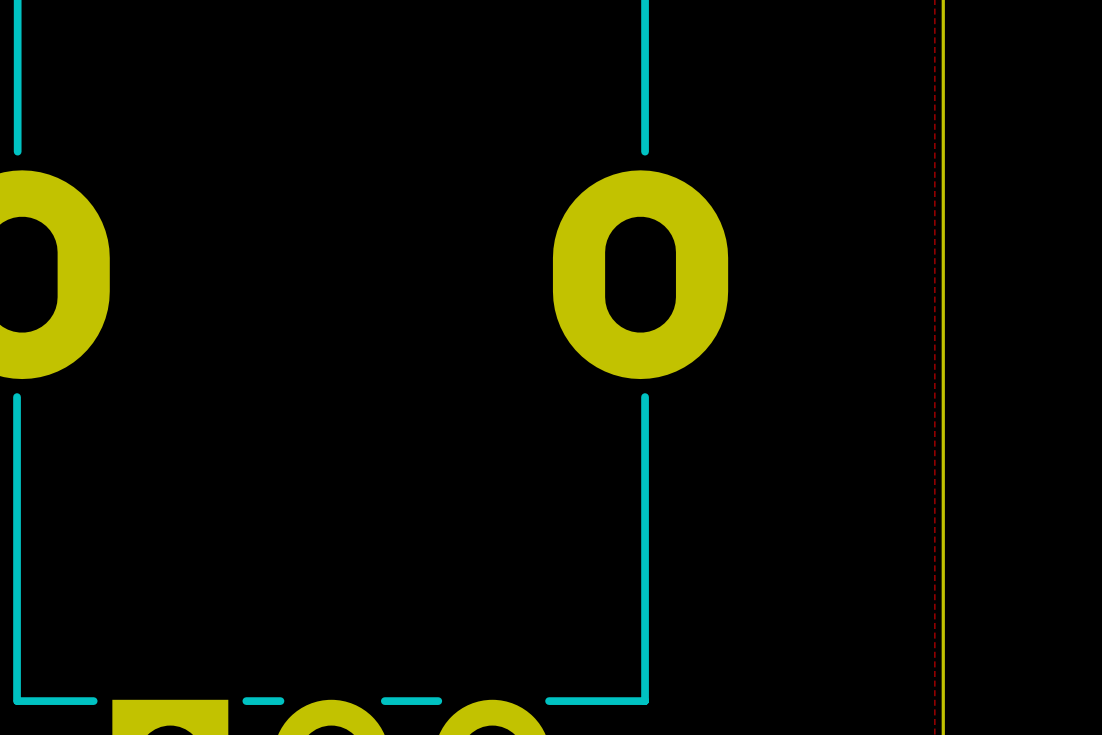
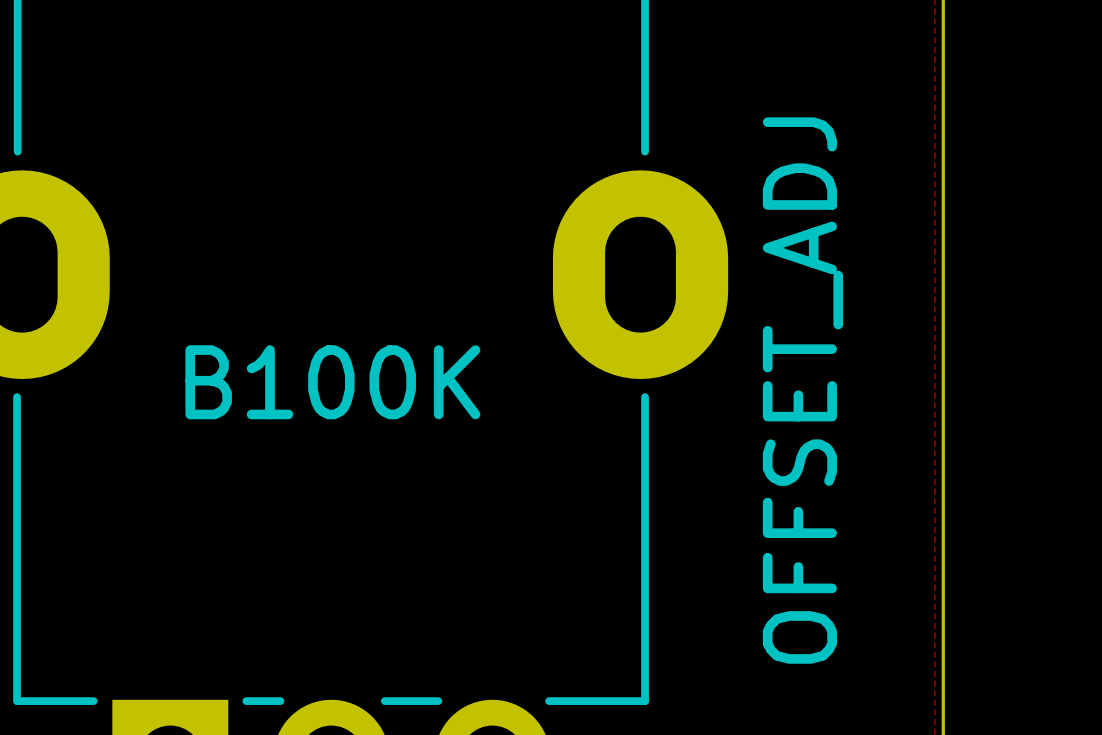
part text: none -> B100K (332, 382)
part value: none -> OFFSET_ADJ (802, 390)

